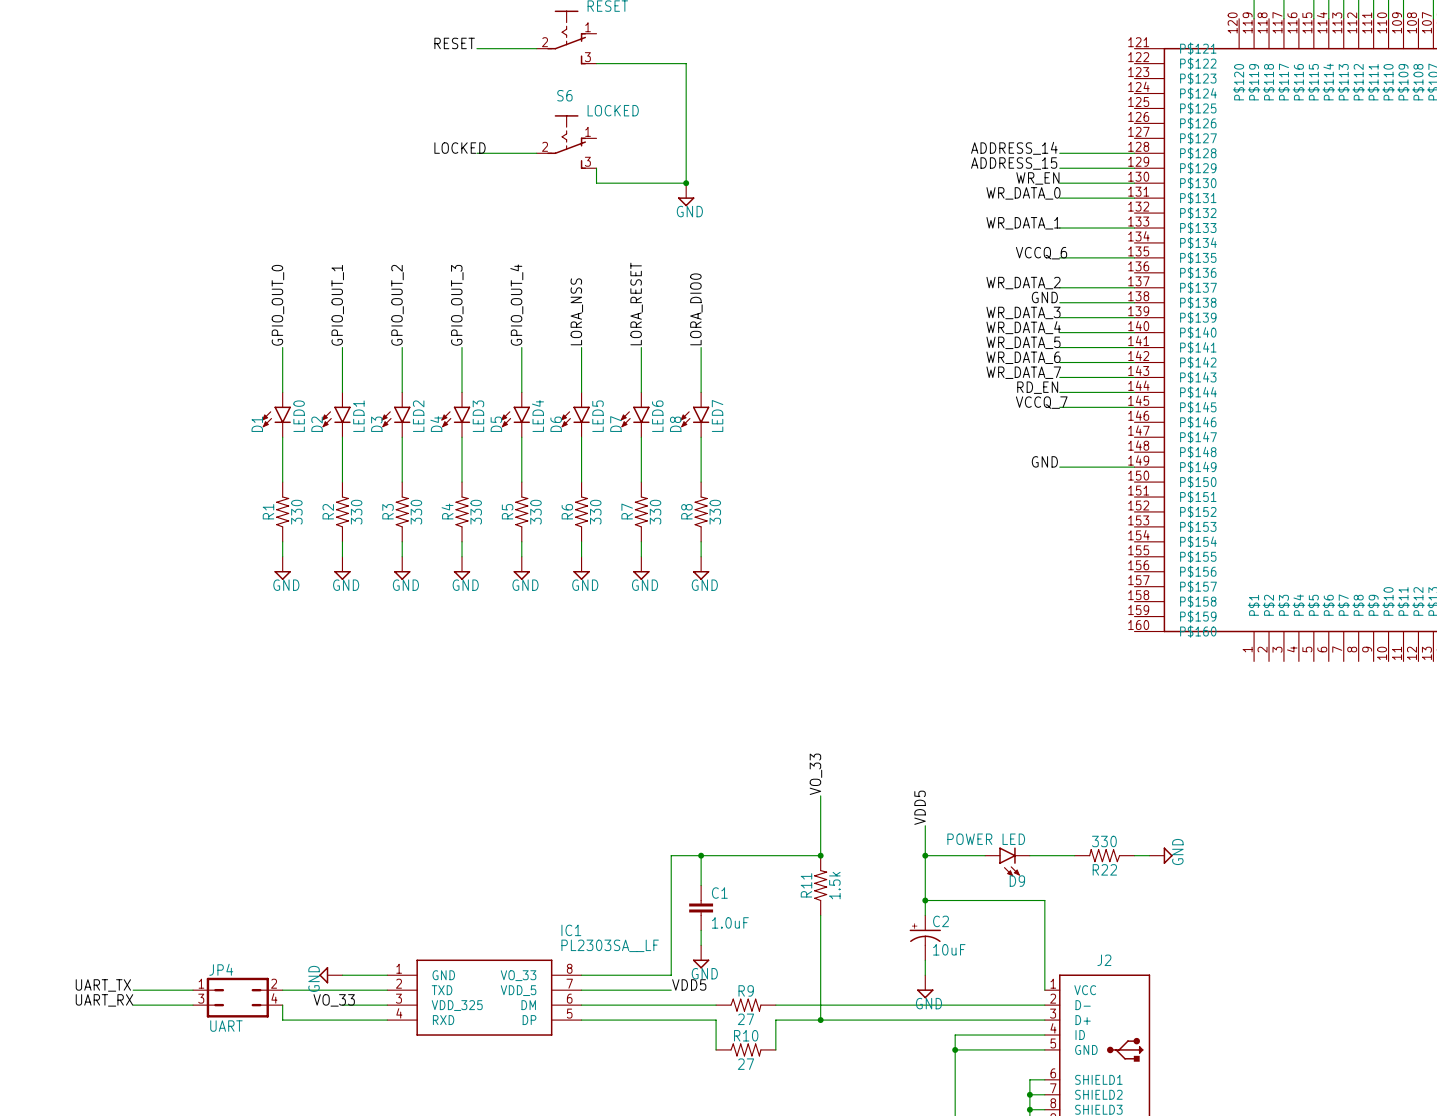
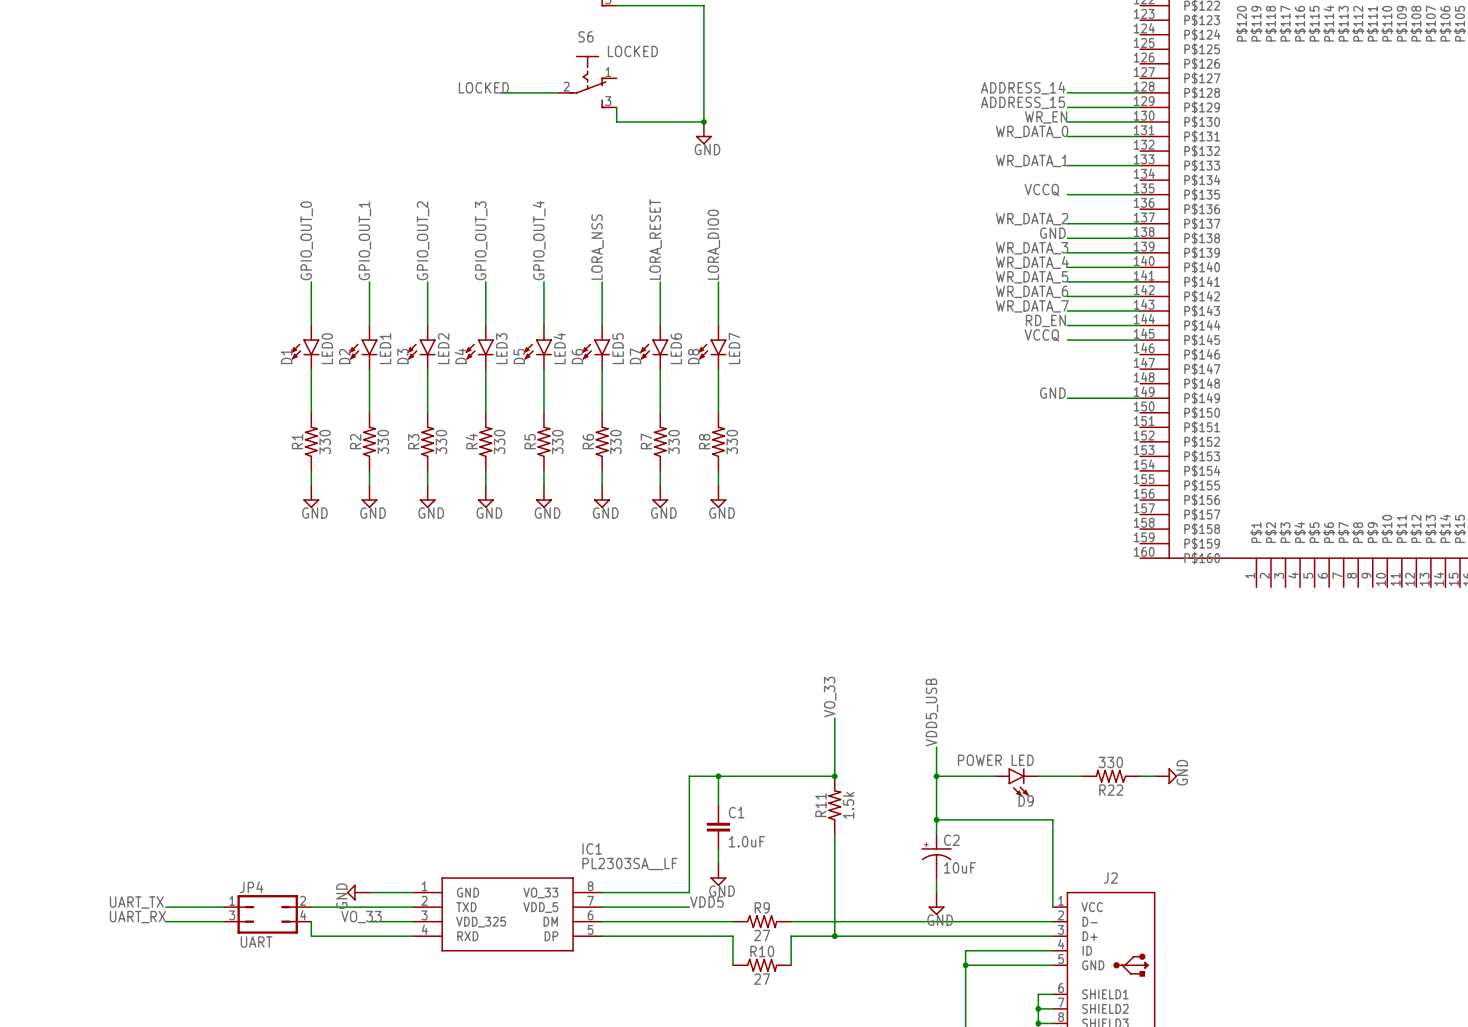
label: VCCQ_6 (1041, 253) -> VCCQ (1041, 190)
label: VCCQ_7 (1041, 402) -> VCCQ (1041, 335)
label: VDD5 (920, 807) -> VDD5_USB (931, 712)

